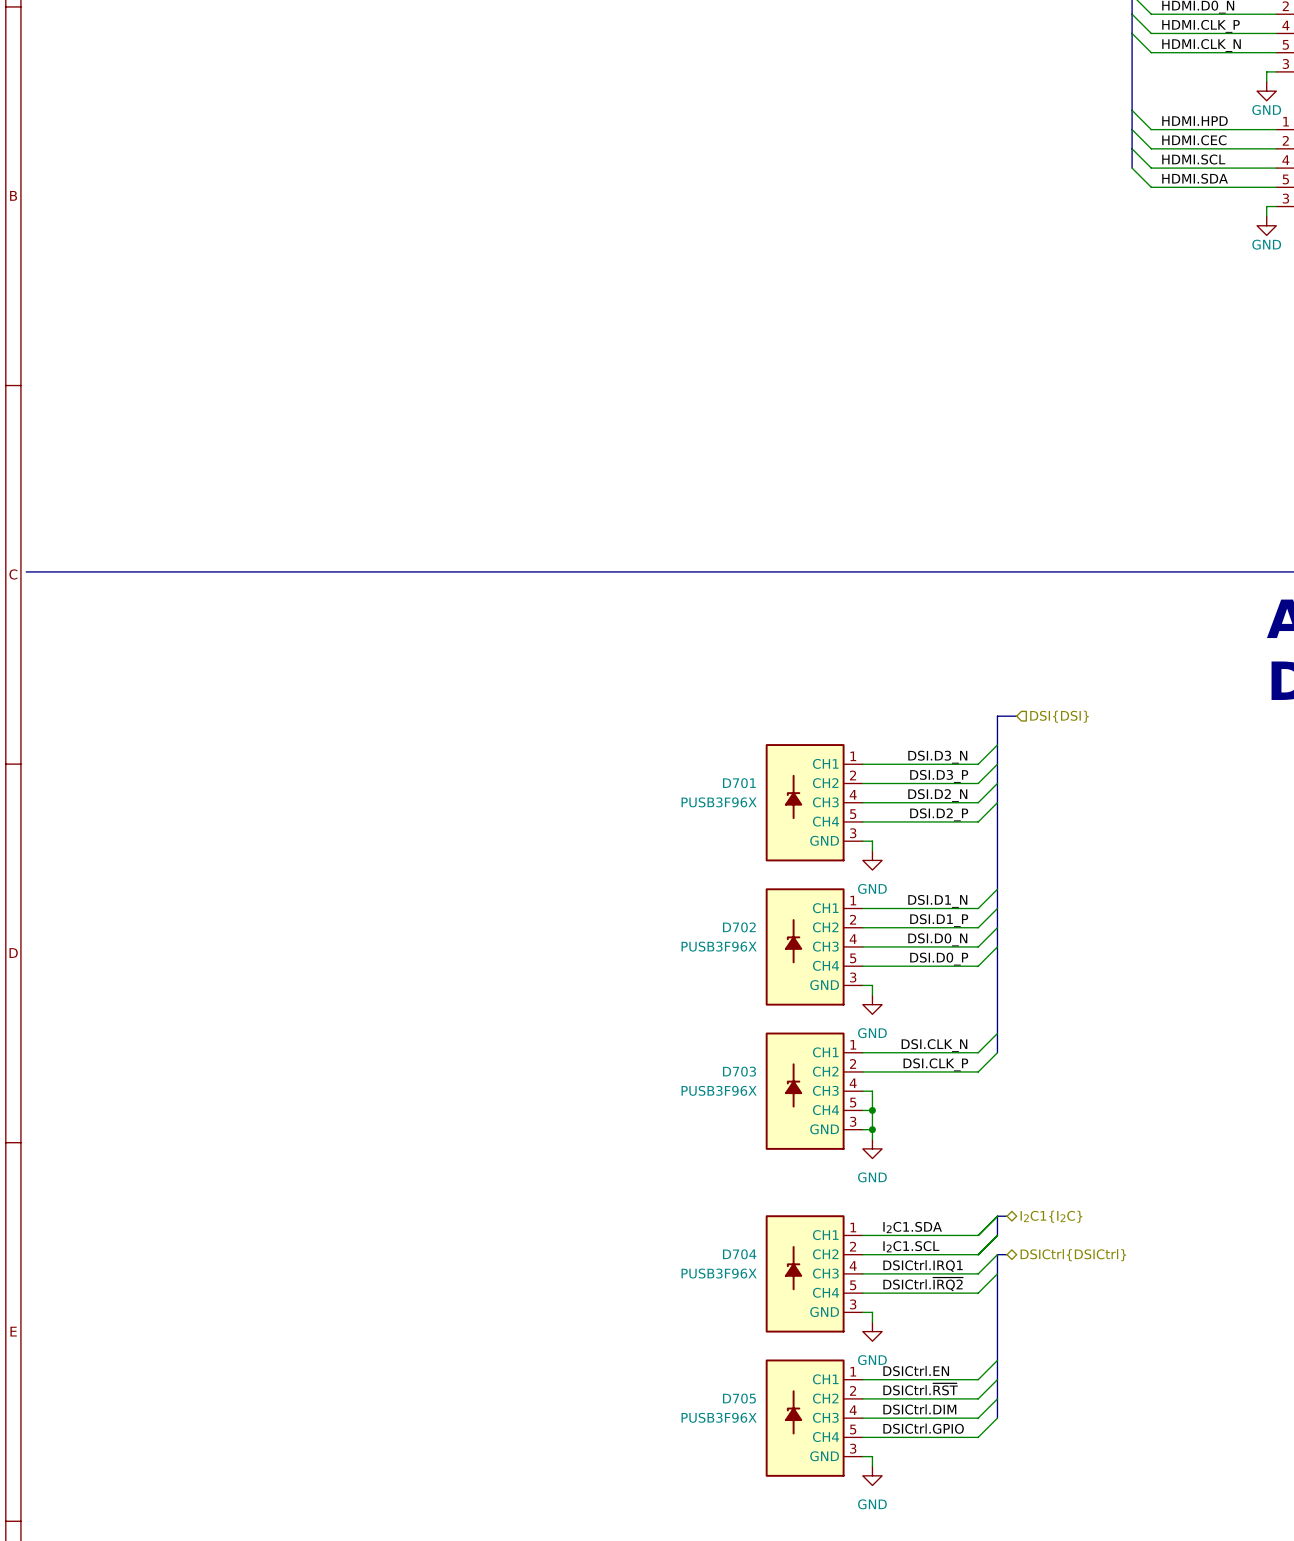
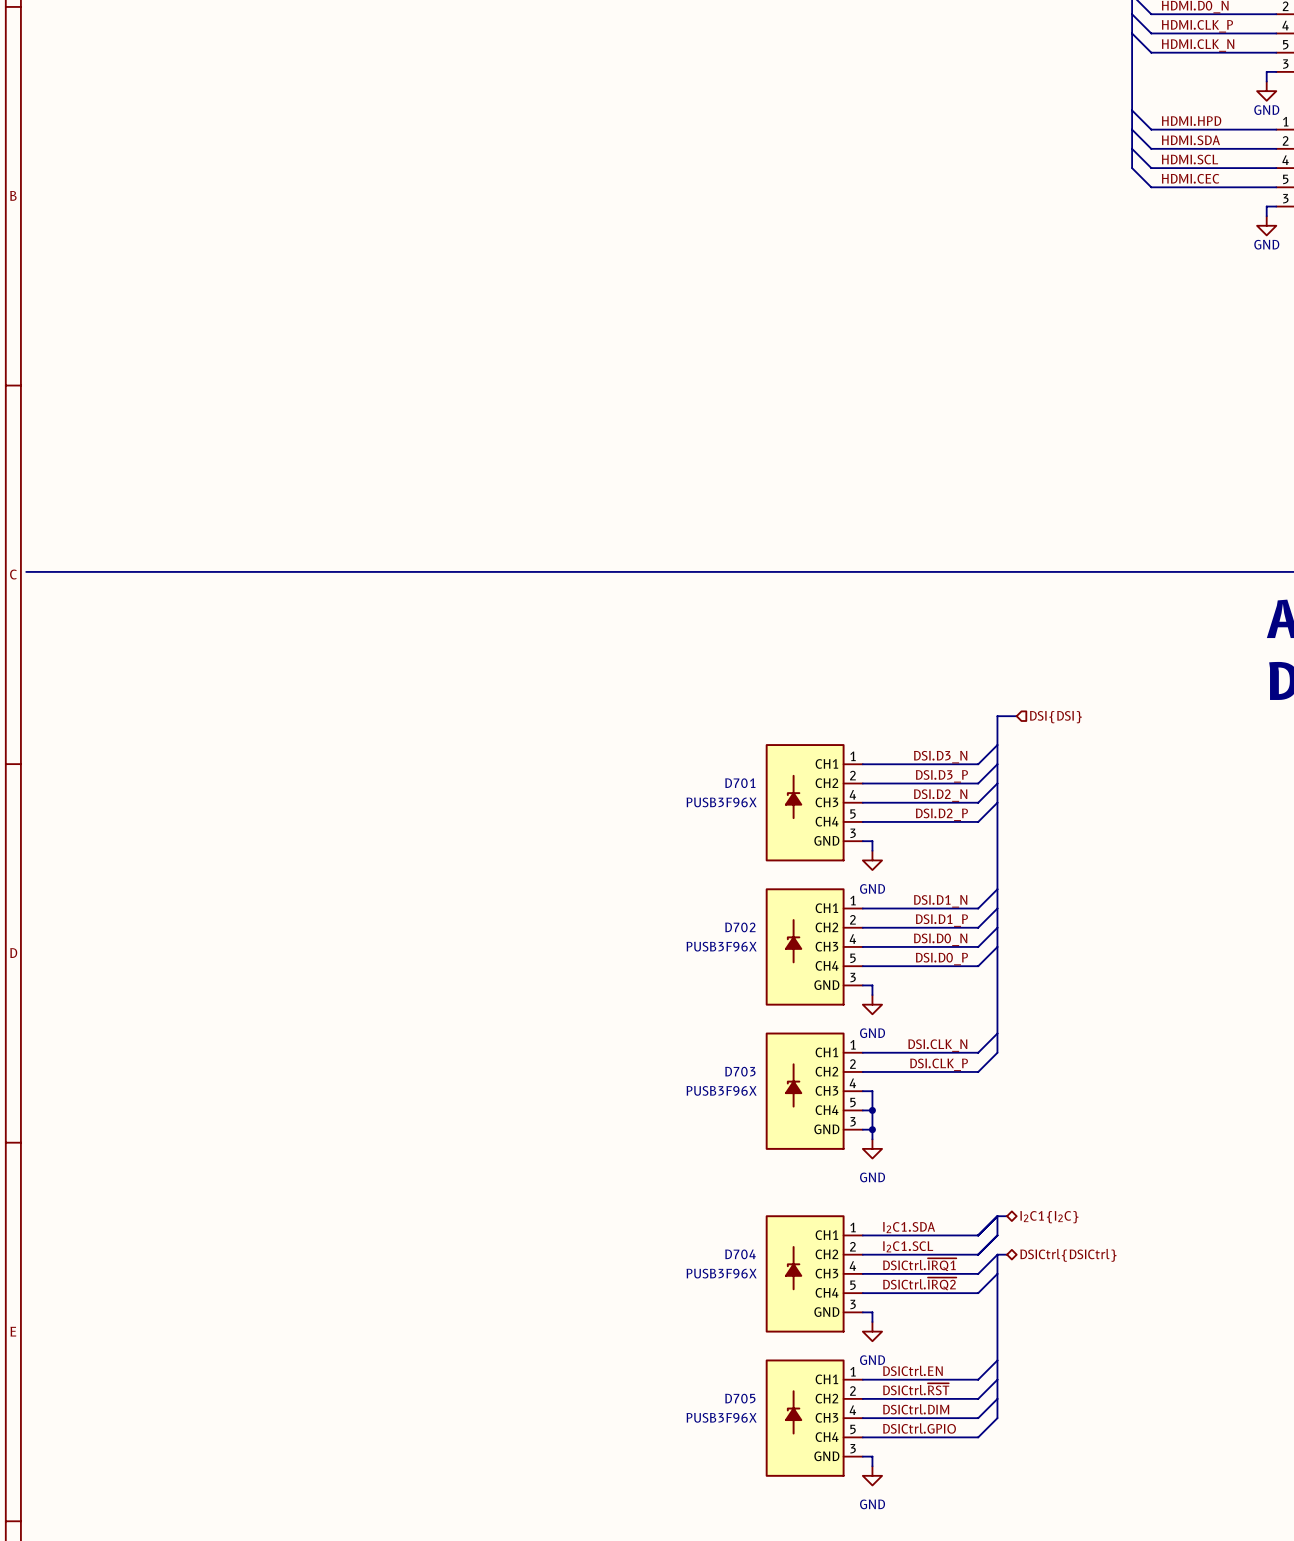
label: HDMI.CEC (1194, 140) -> HDMI.SDA (1190, 140)
label: HDMI.SDA (1195, 178) -> HDMI.CEC (1190, 178)
label: DSICtrl.IRQ1 (923, 1265) -> DSICtrl.~{IRQ1} (919, 1264)

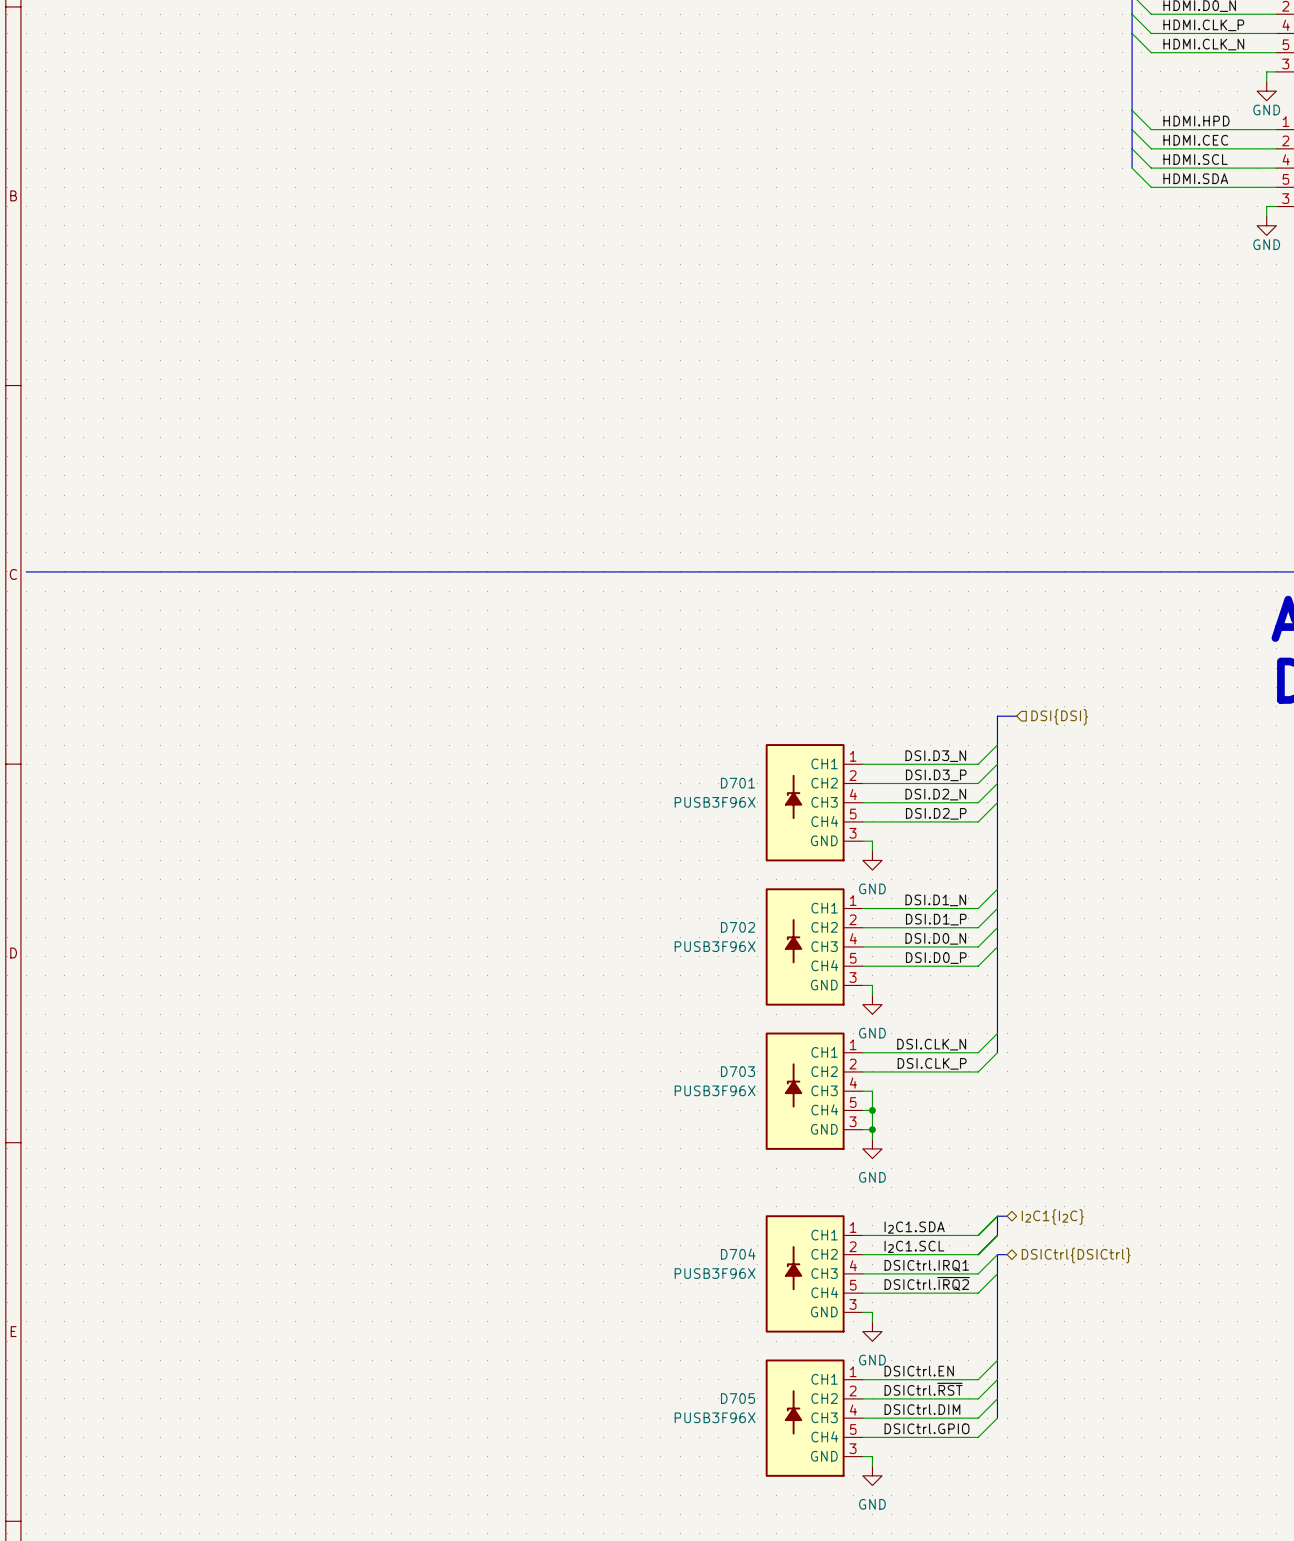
label: HDMI.SDA (1190, 140) -> HDMI.CEC (1195, 140)
label: HDMI.CEC (1190, 178) -> HDMI.SDA (1195, 178)
label: DSICtrl.~{IRQ1} (919, 1264) -> DSICtrl.IRQ1 (926, 1265)

